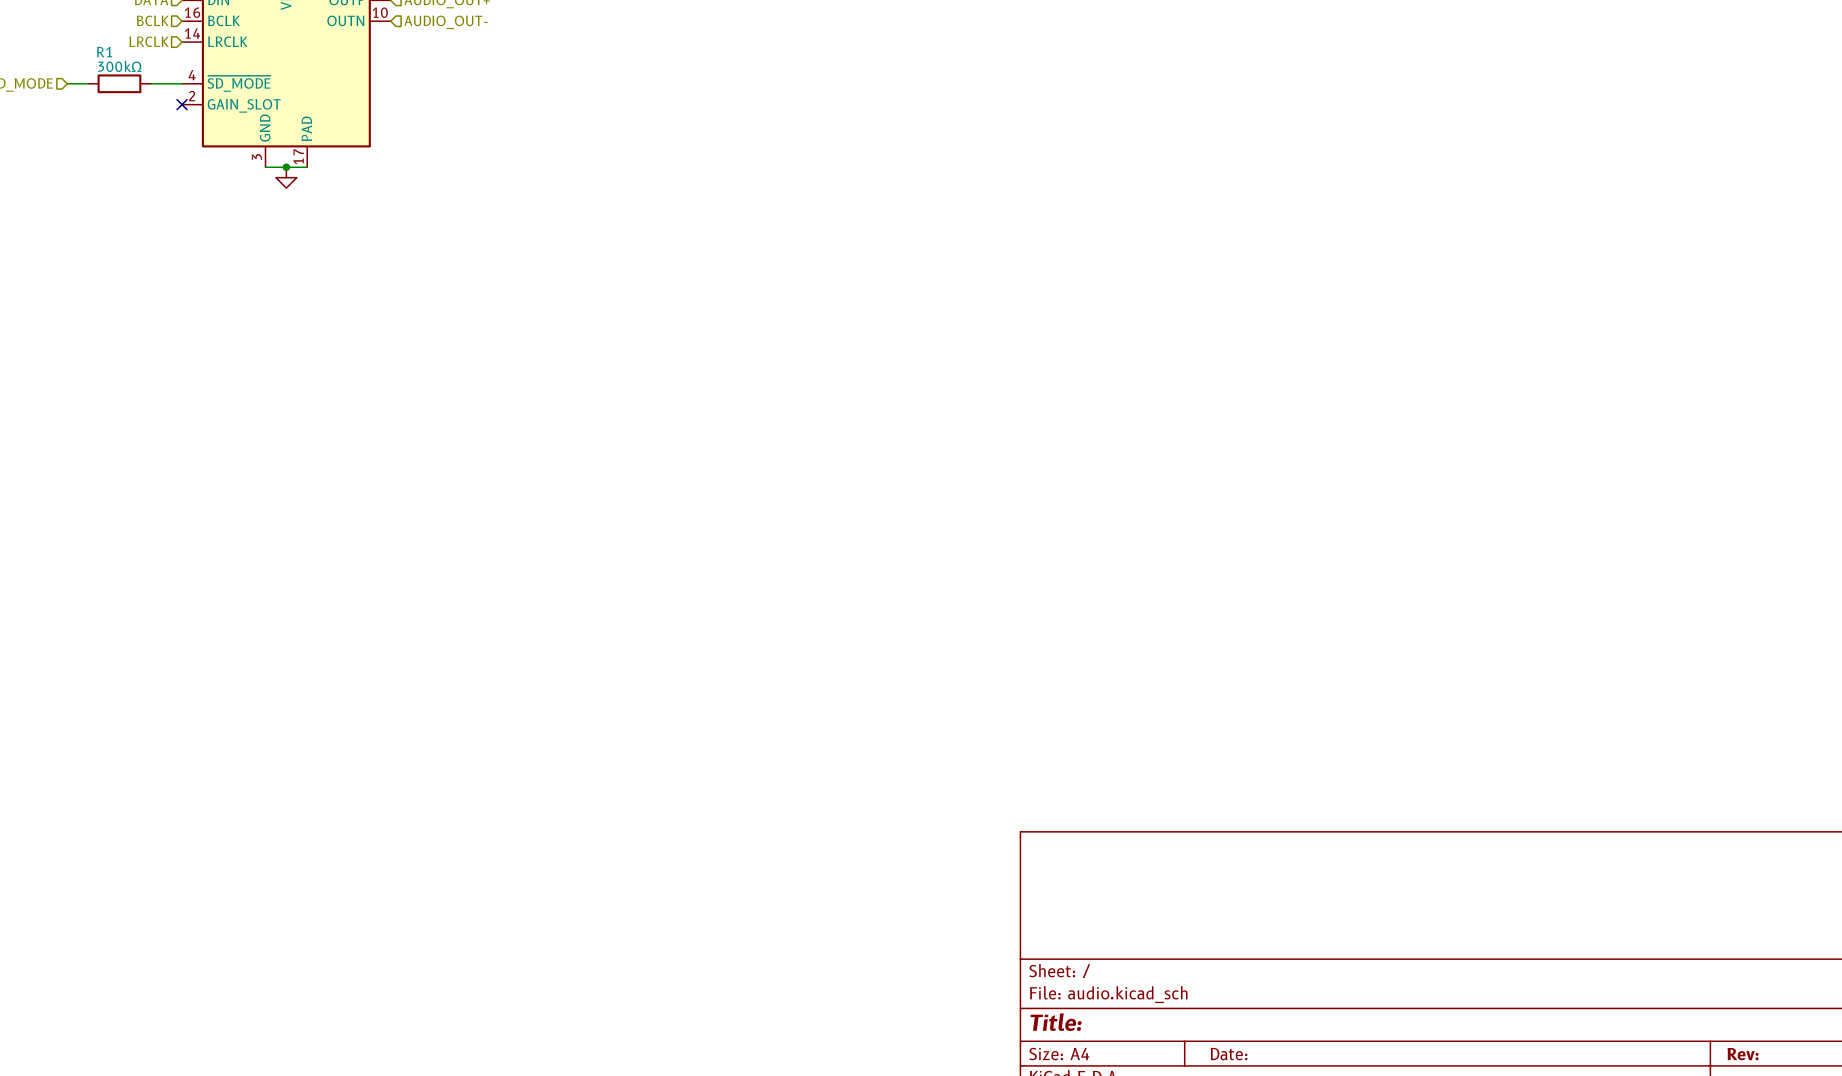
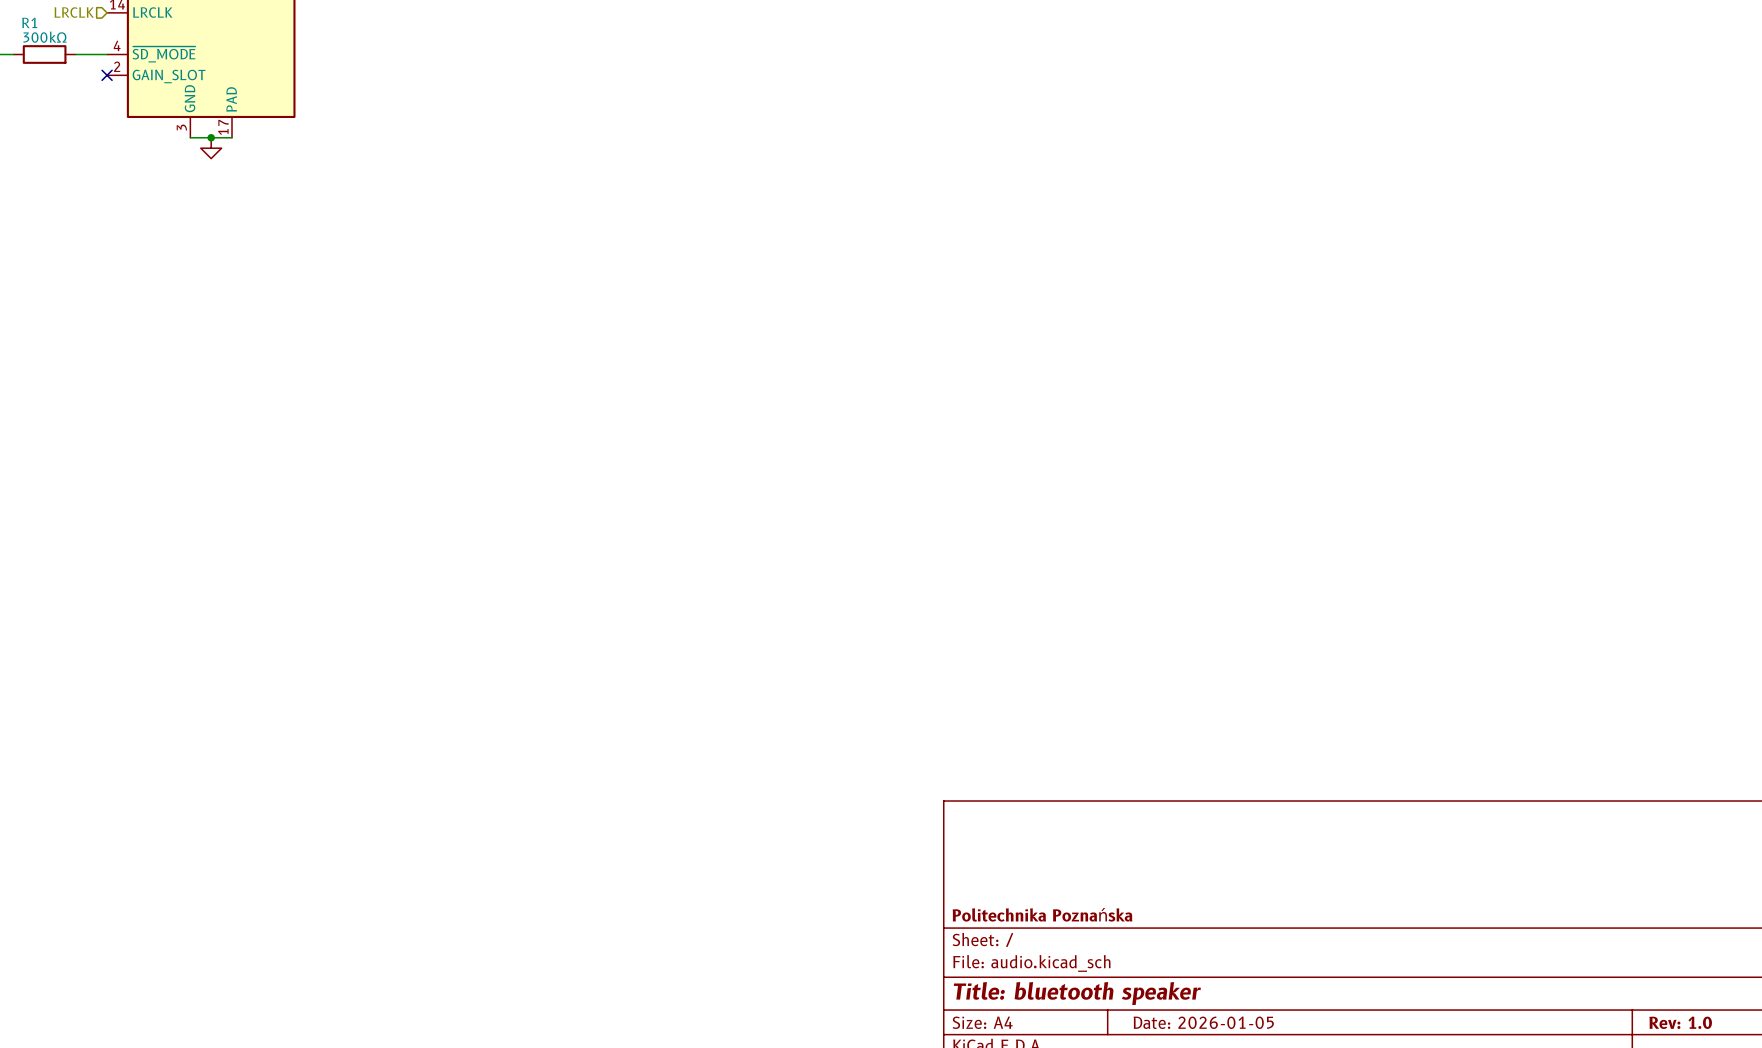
title block: none -> Politechnika Poznańska (1042, 914)
title block: Title: (1056, 1022) -> Title: bluetooth speaker (1077, 993)
title block: Date: (1229, 1054) -> Date: 2026-01-05 (1203, 1022)
title block: Rev: (1743, 1054) -> Rev: 1.0 (1680, 1022)

